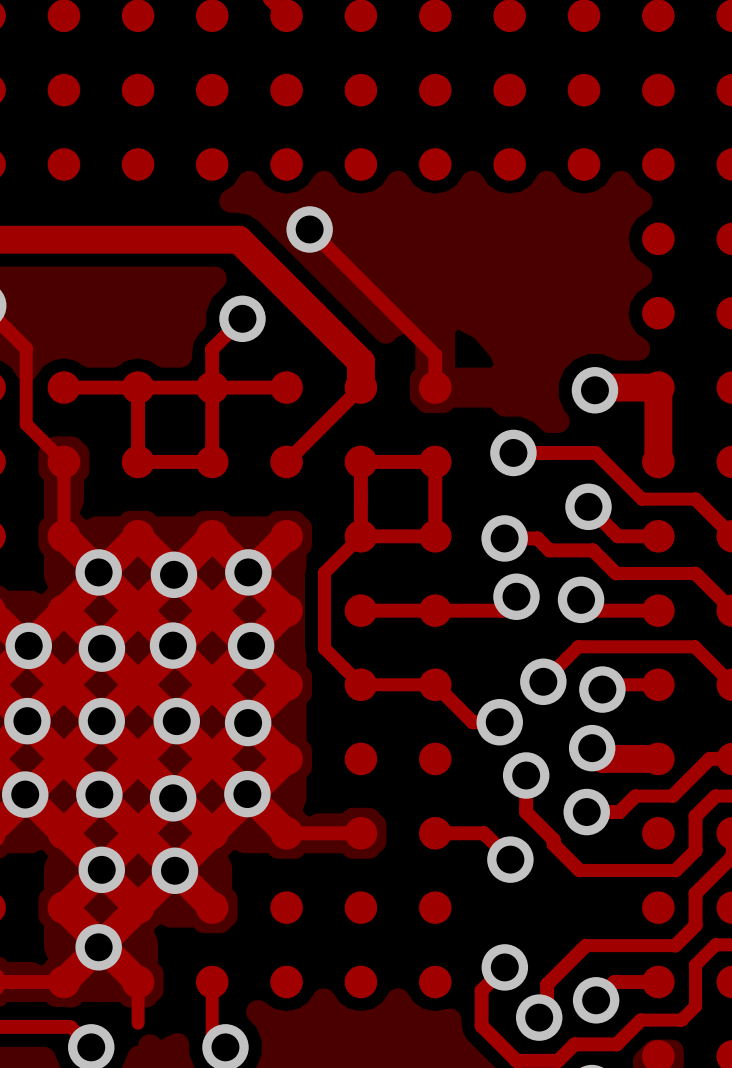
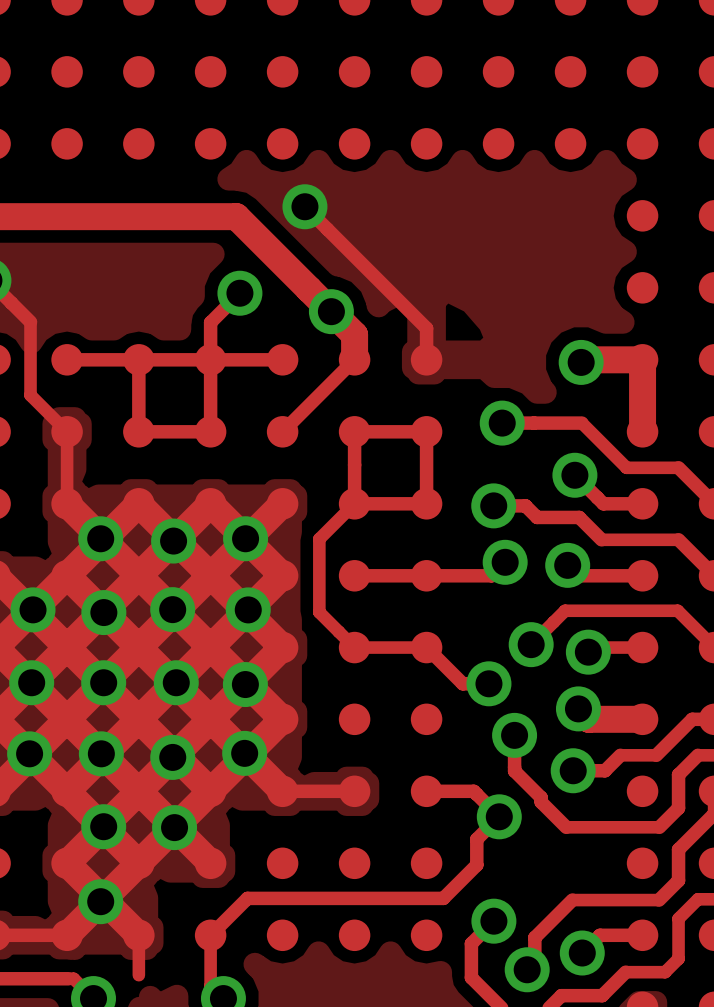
via: none -> (331, 311)
track: none -> (499, 816) (476, 839) (476, 865) (443, 898) (247, 898) (210, 935)

